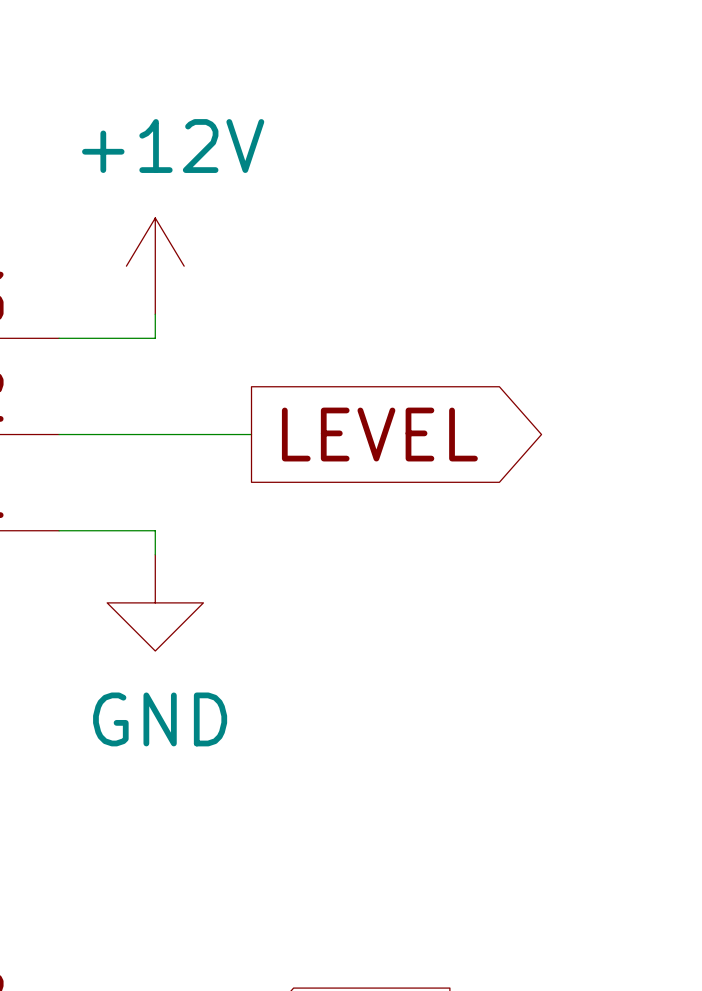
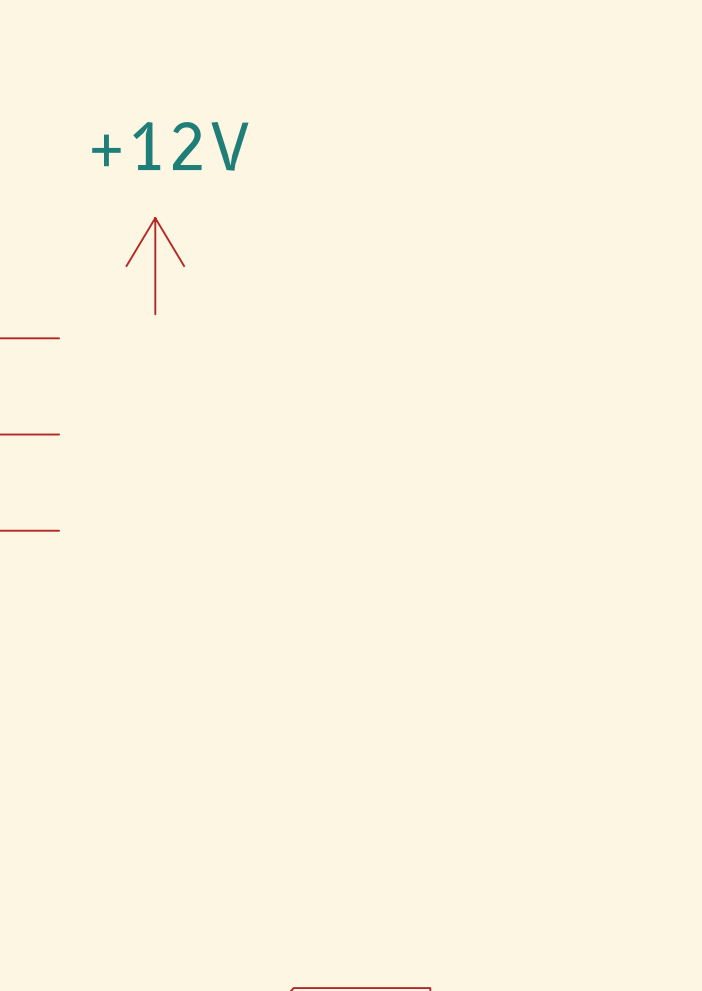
wire: (155, 314) (155, 338) (59, 338) -> none
wire: (59, 434) (251, 434) -> none
global label: LEVEL (379, 434) -> none
wire: (59, 530) (155, 530) (155, 554) -> none
power symbol: GND (155, 602) -> none

